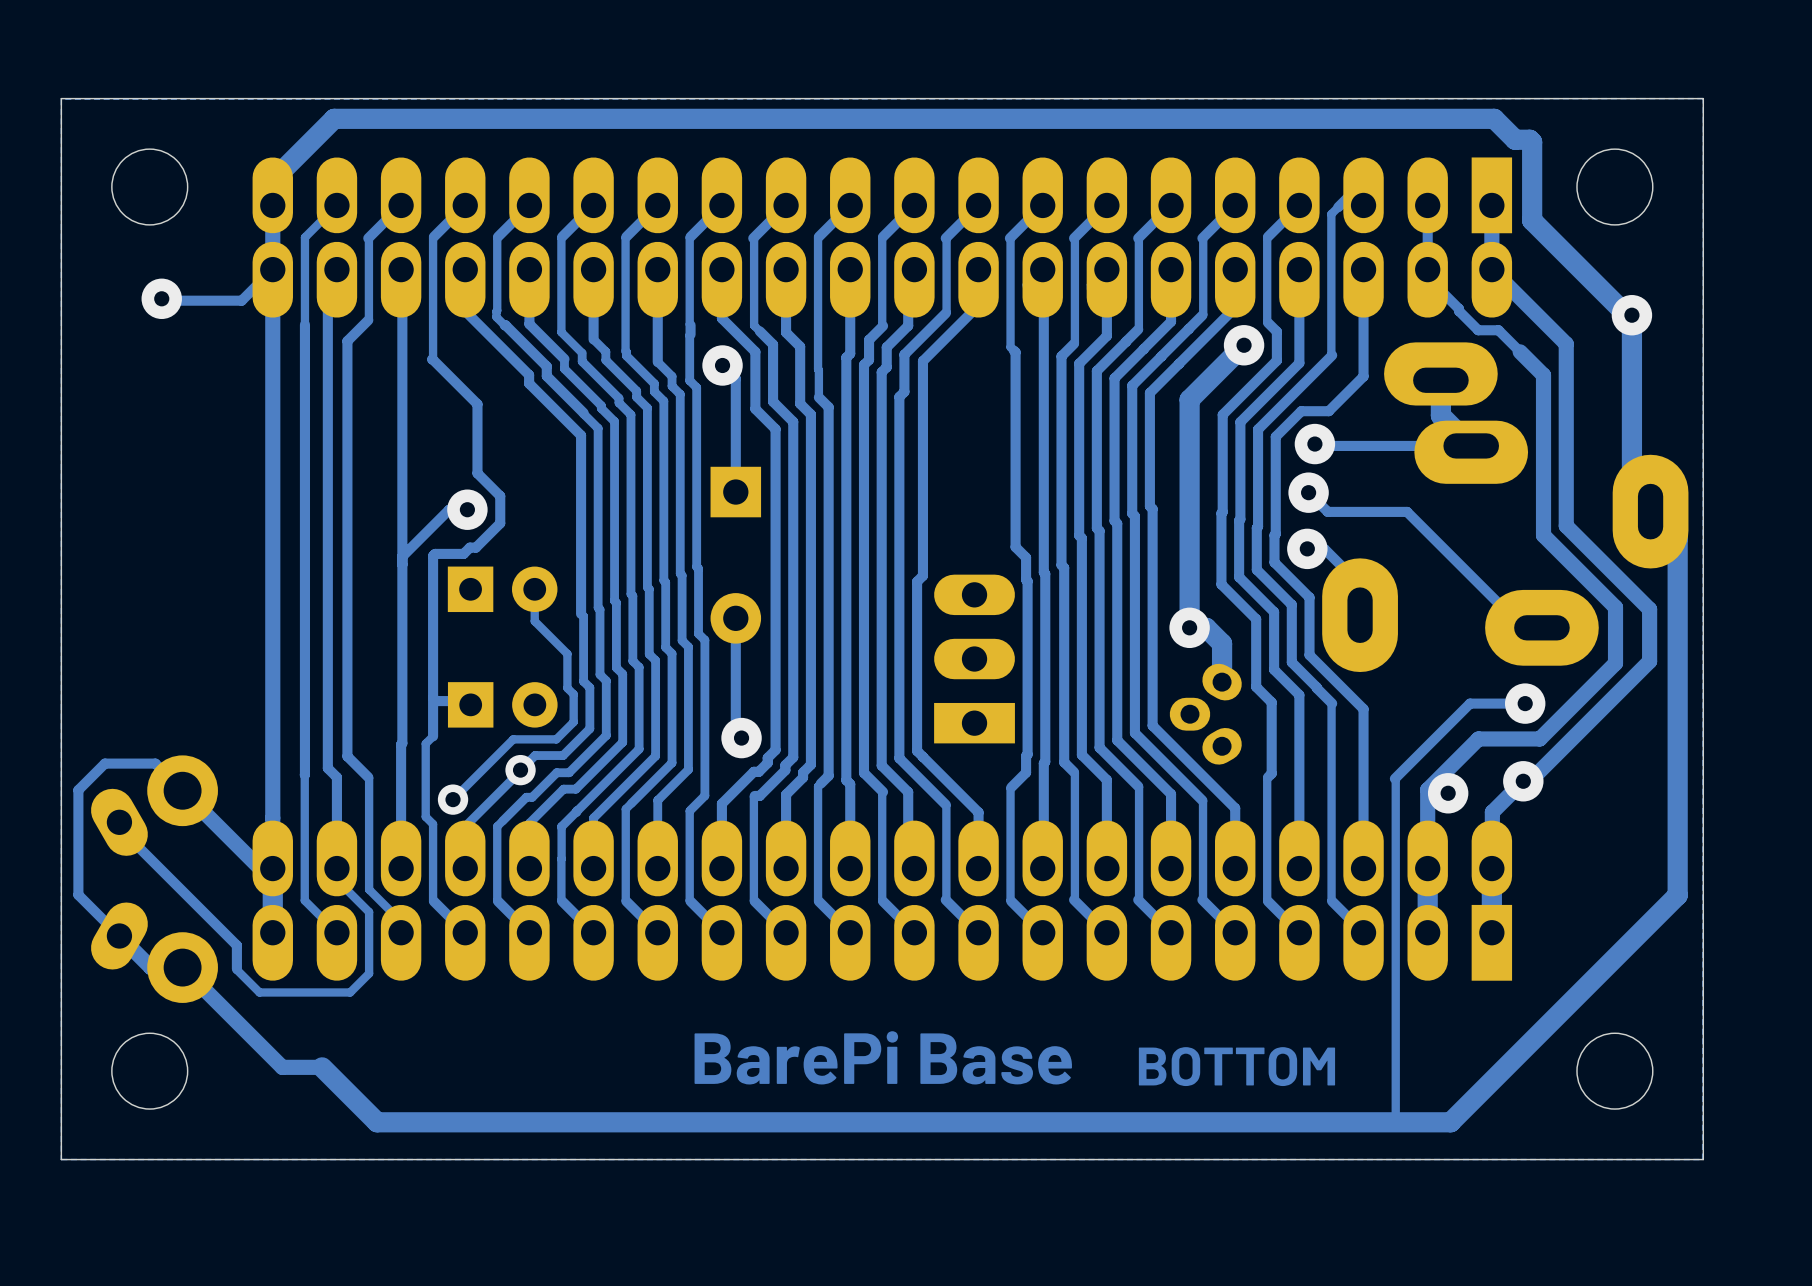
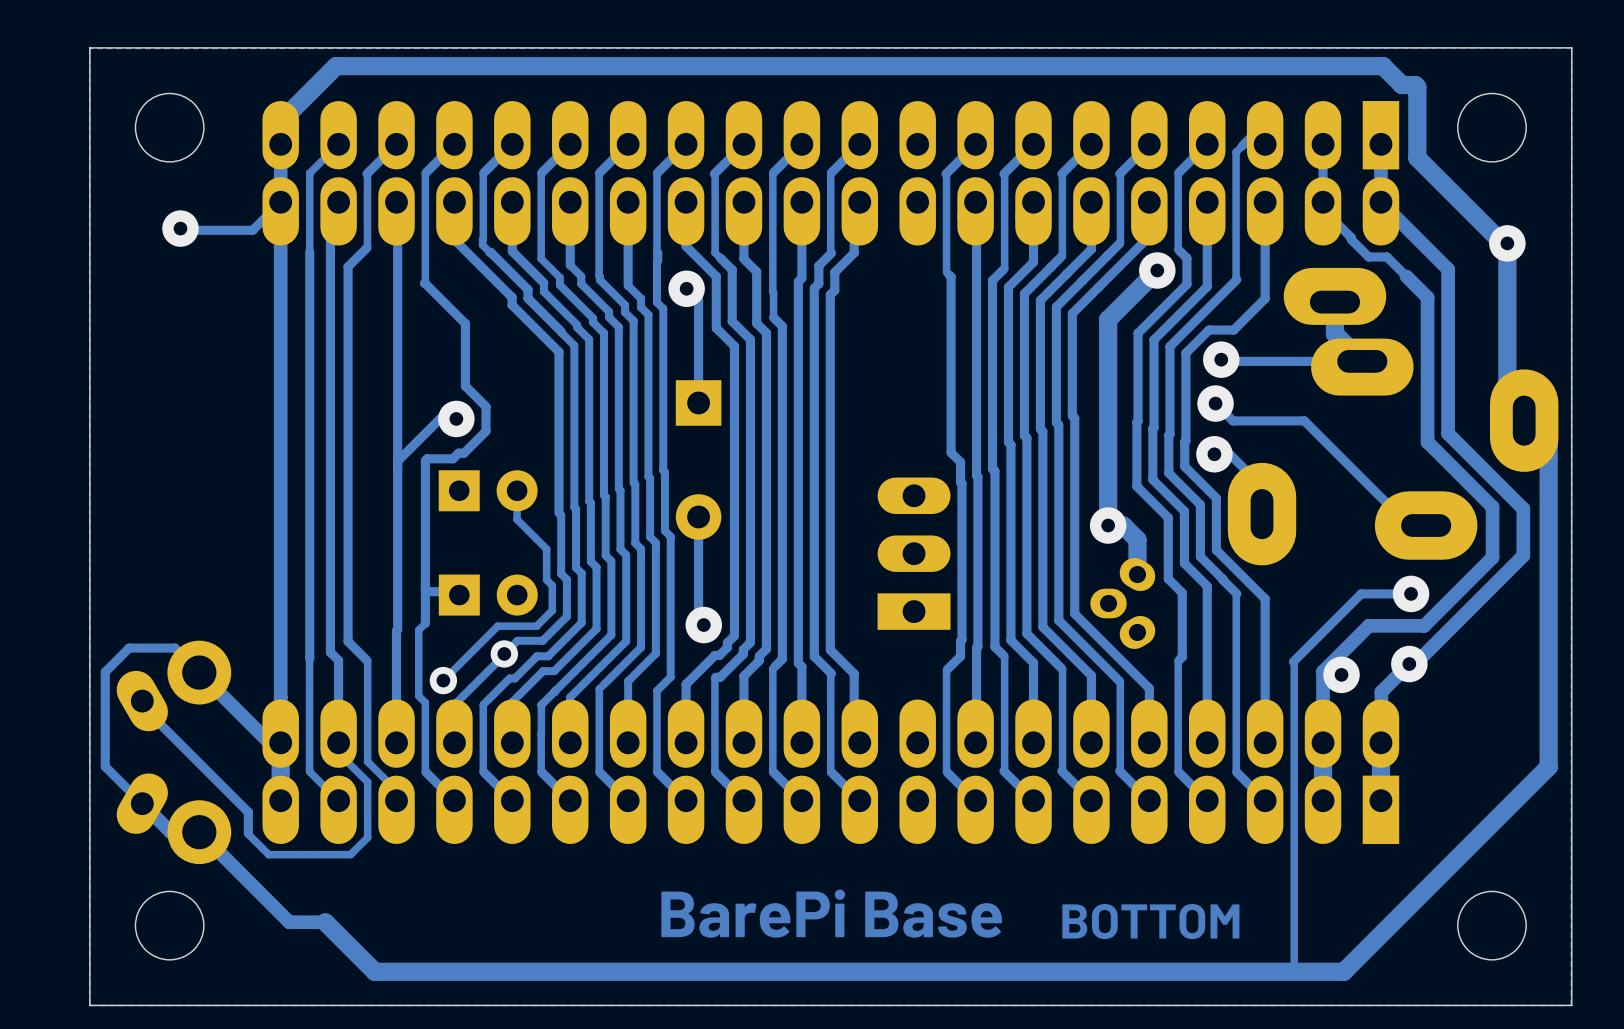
track: (978, 205) (945, 238) (946, 312) (904, 354) (904, 391) (899, 396) (899, 758) (946, 805) (945, 899) (978, 932) -> none
track: (978, 305) (922, 361) (922, 575) (917, 581) (917, 750) (978, 812) (978, 868) -> none

